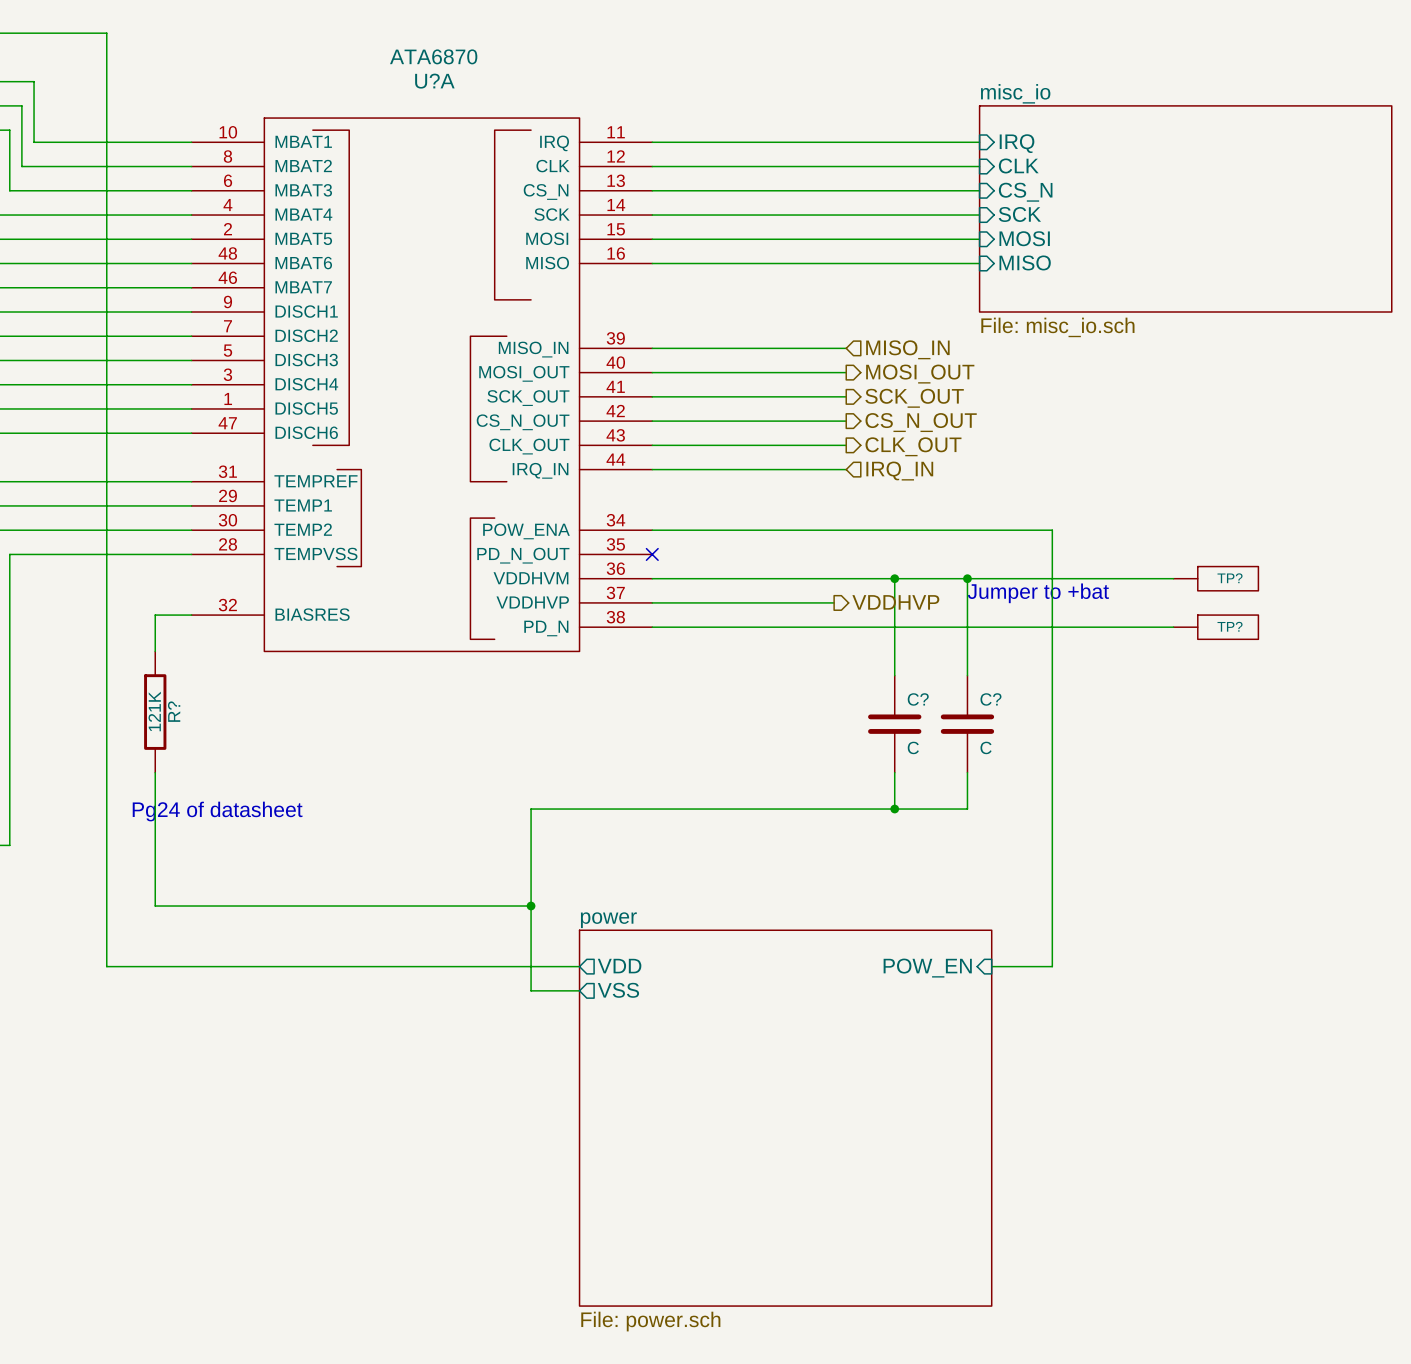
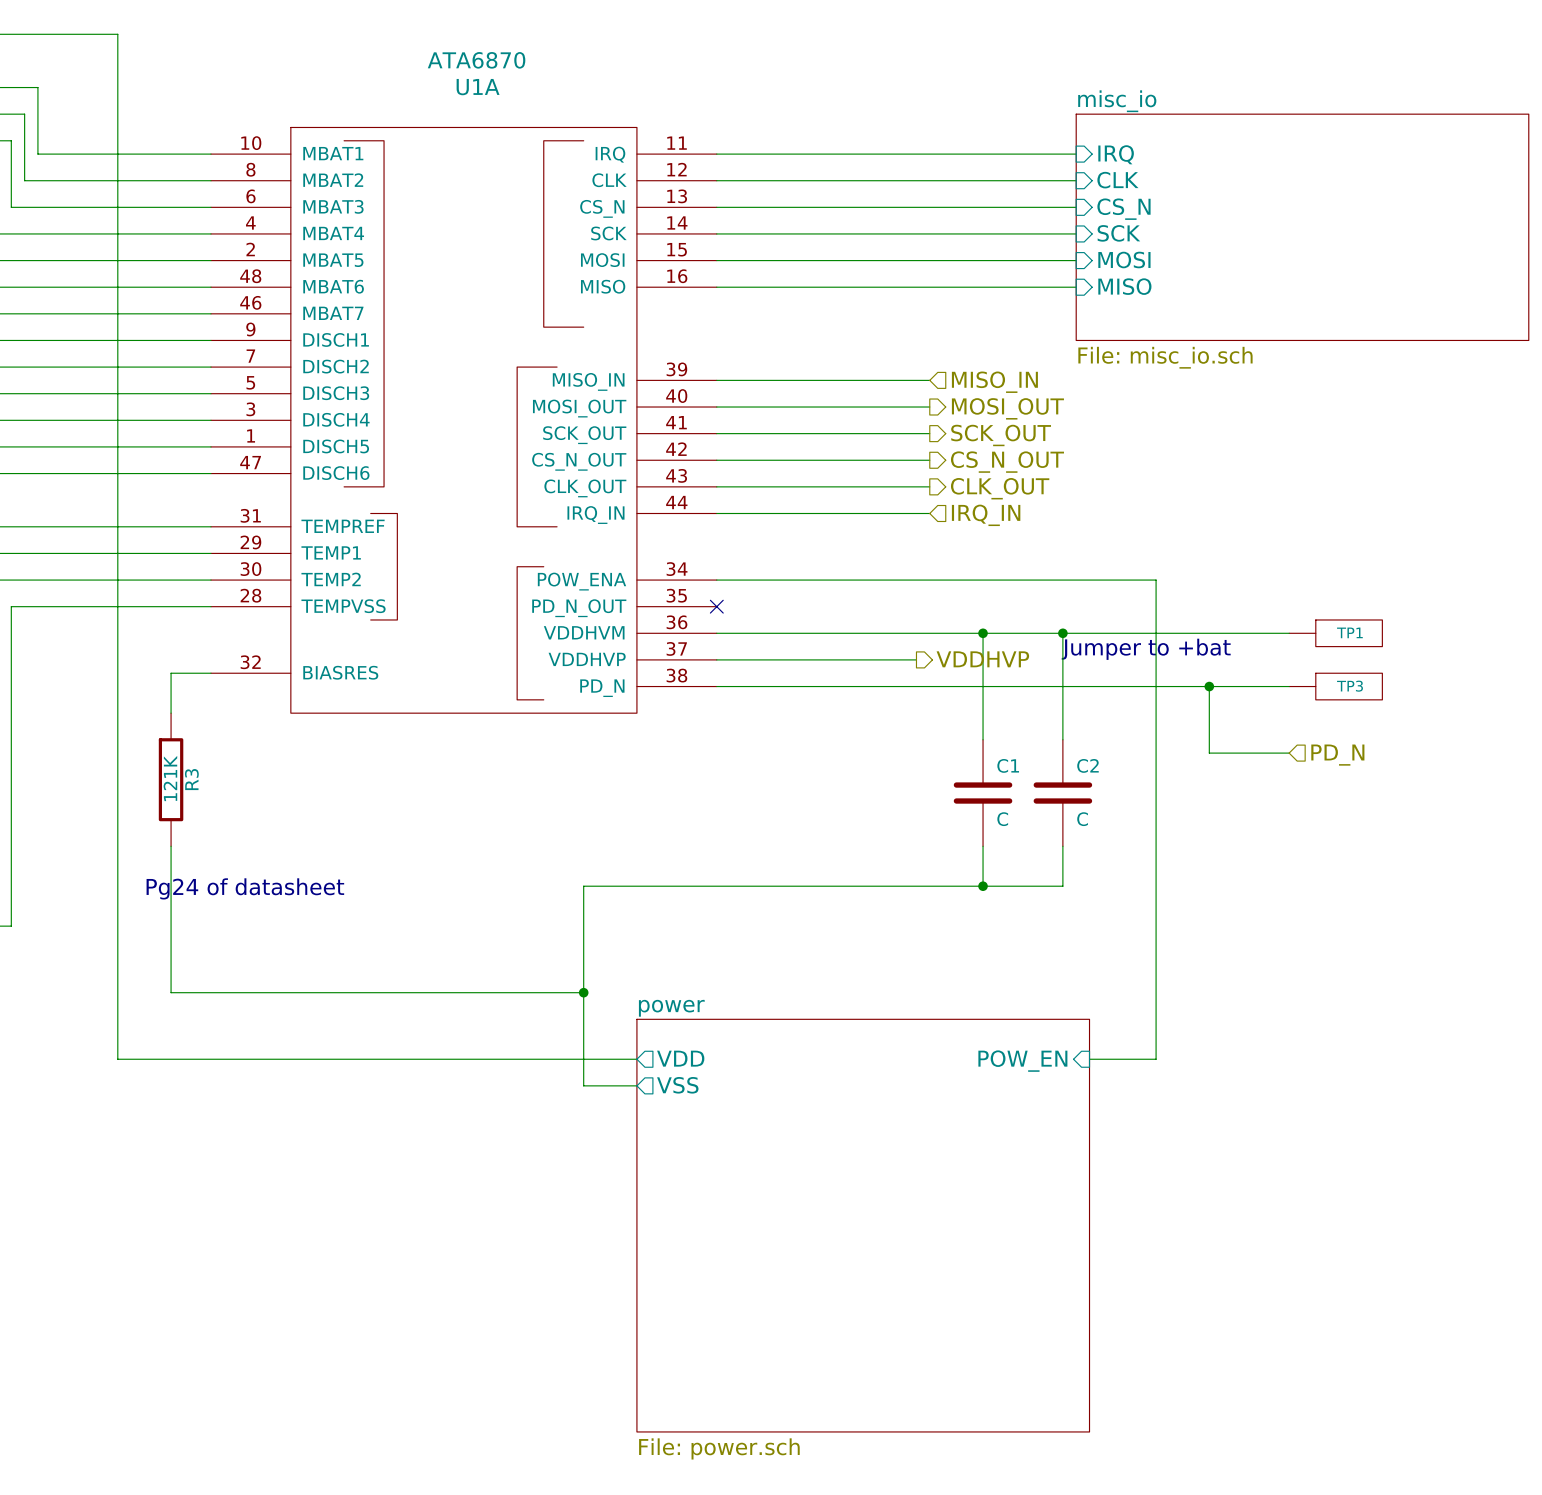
U?A name: U?A (434, 81) -> U1A (478, 87)
TP? name: TP? (1230, 578) -> TP1 (1349, 632)
TP? name: TP? (1230, 626) -> TP3 (1350, 686)
wire: none -> (1209, 686) (1209, 753) (1289, 753)
junction: none -> (1209, 686)
hierarchical label: none -> PD_N (1337, 755)
C? name: C? (918, 699) -> C1 (1008, 765)
C? name: C? (990, 699) -> C2 (1087, 765)
R? name: R? (174, 711) -> R3 (191, 779)

